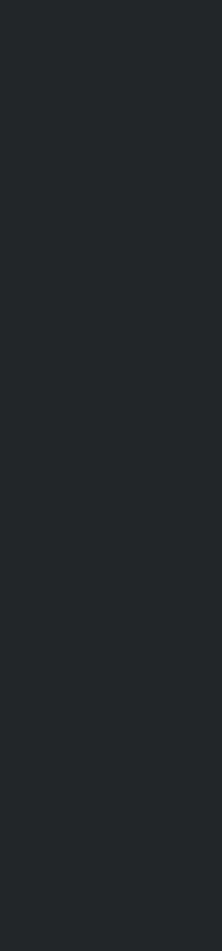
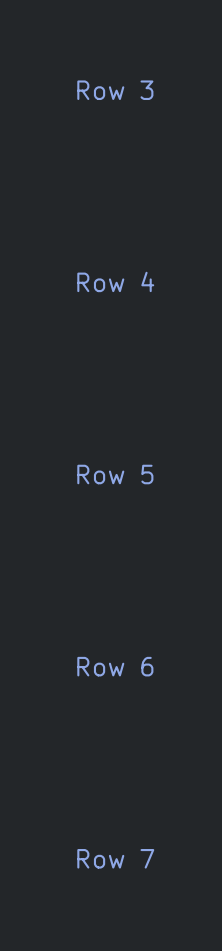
text: none -> Row 3 (115, 90)
text: none -> Row 4 (115, 281)
text: none -> Row 5 (115, 474)
text: none -> Row 6 (115, 666)
text: none -> Row 7 (115, 858)

